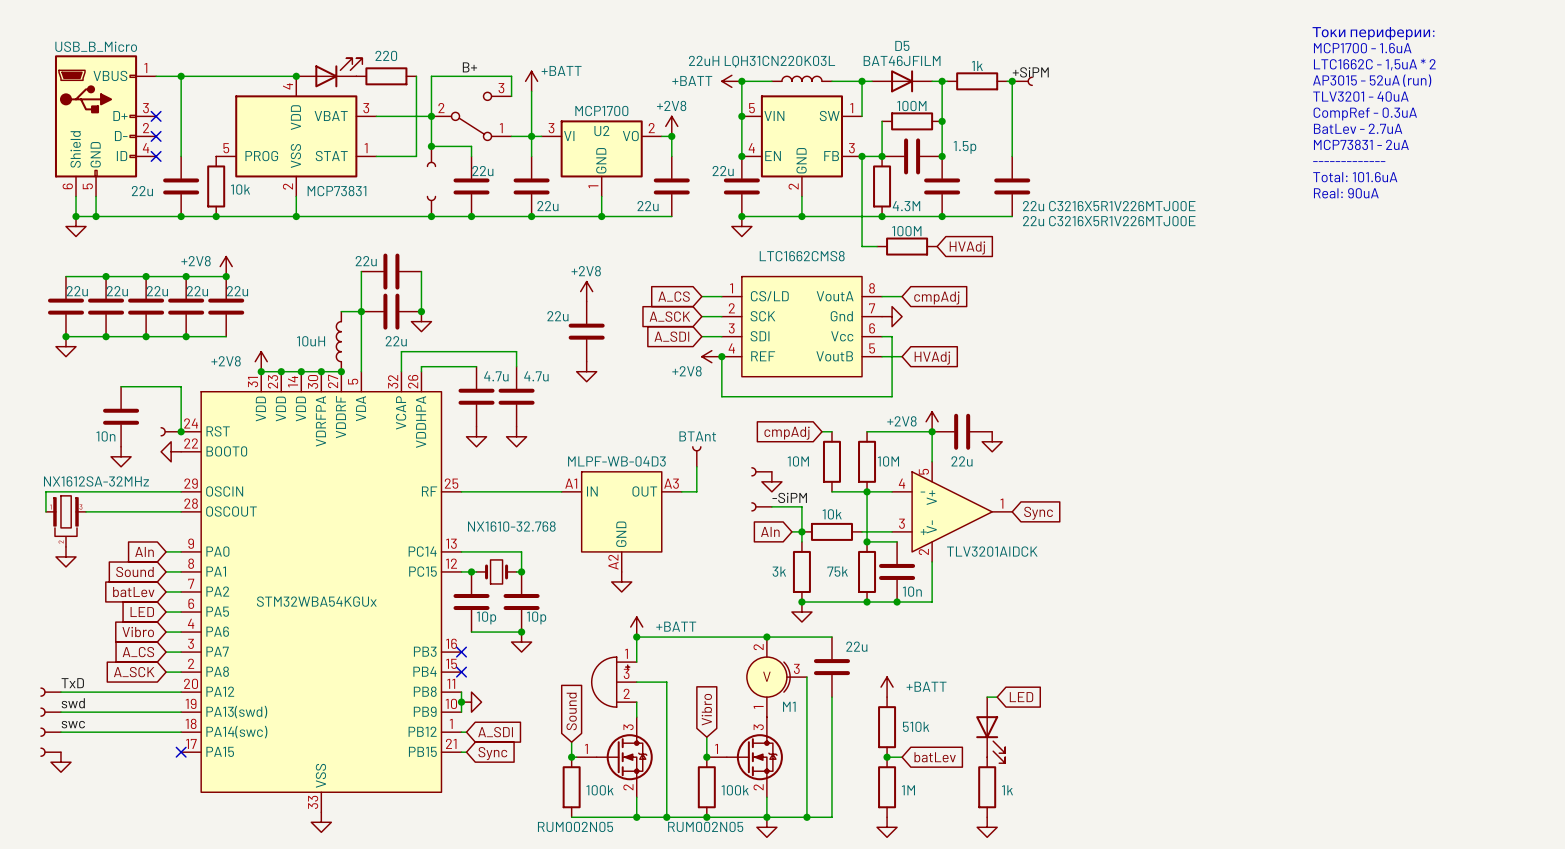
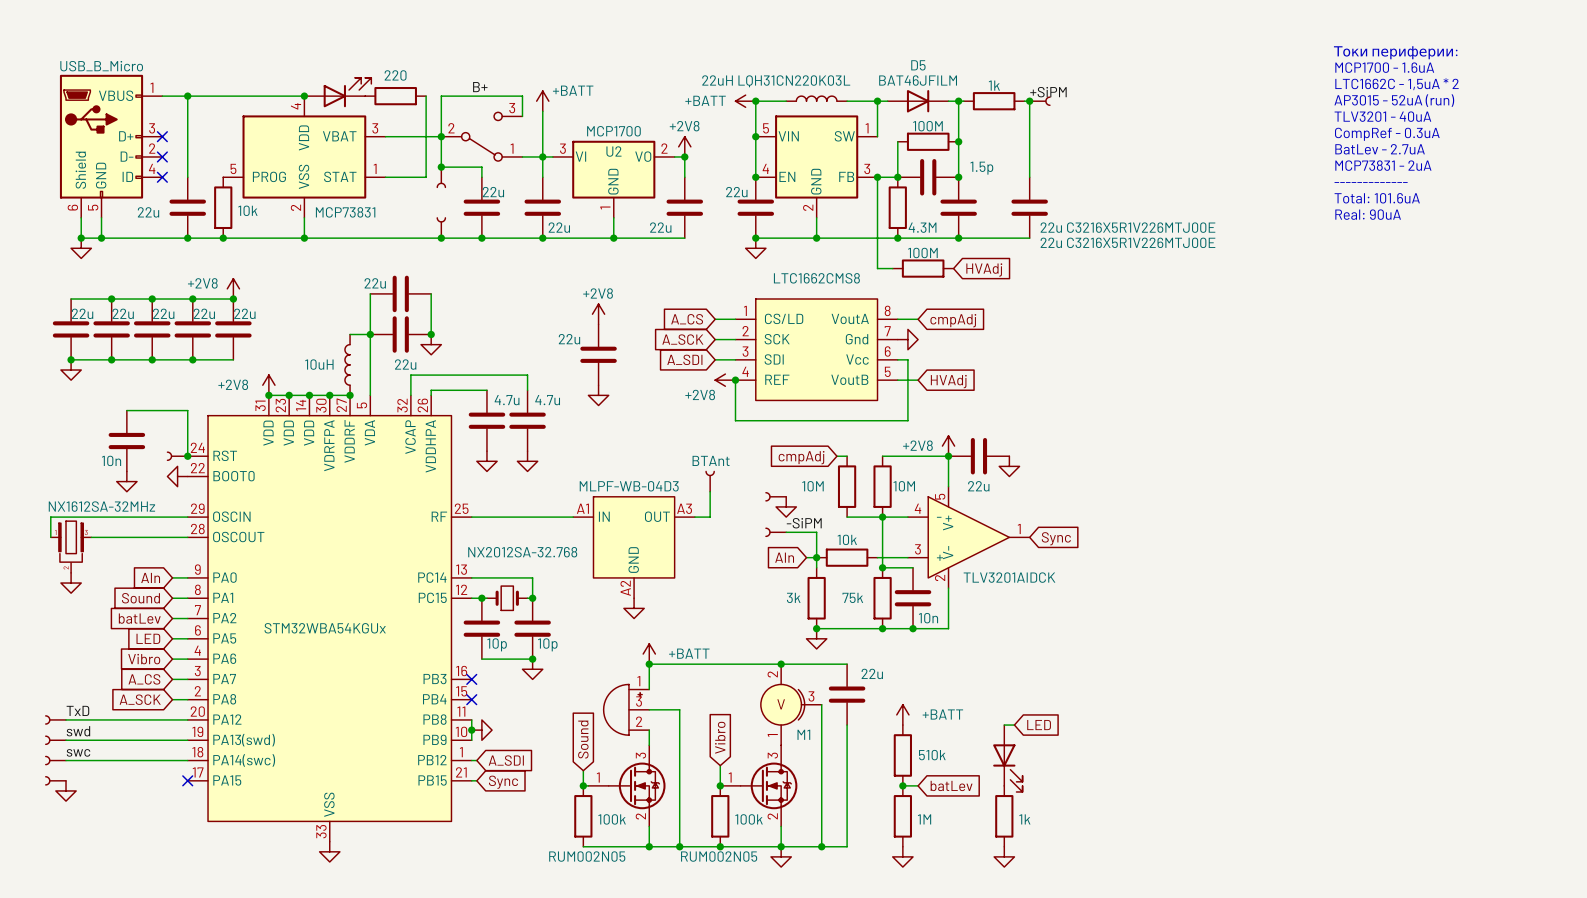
part value: NX1610-32.768 (511, 526) -> NX2012SA-32.768 (522, 552)

